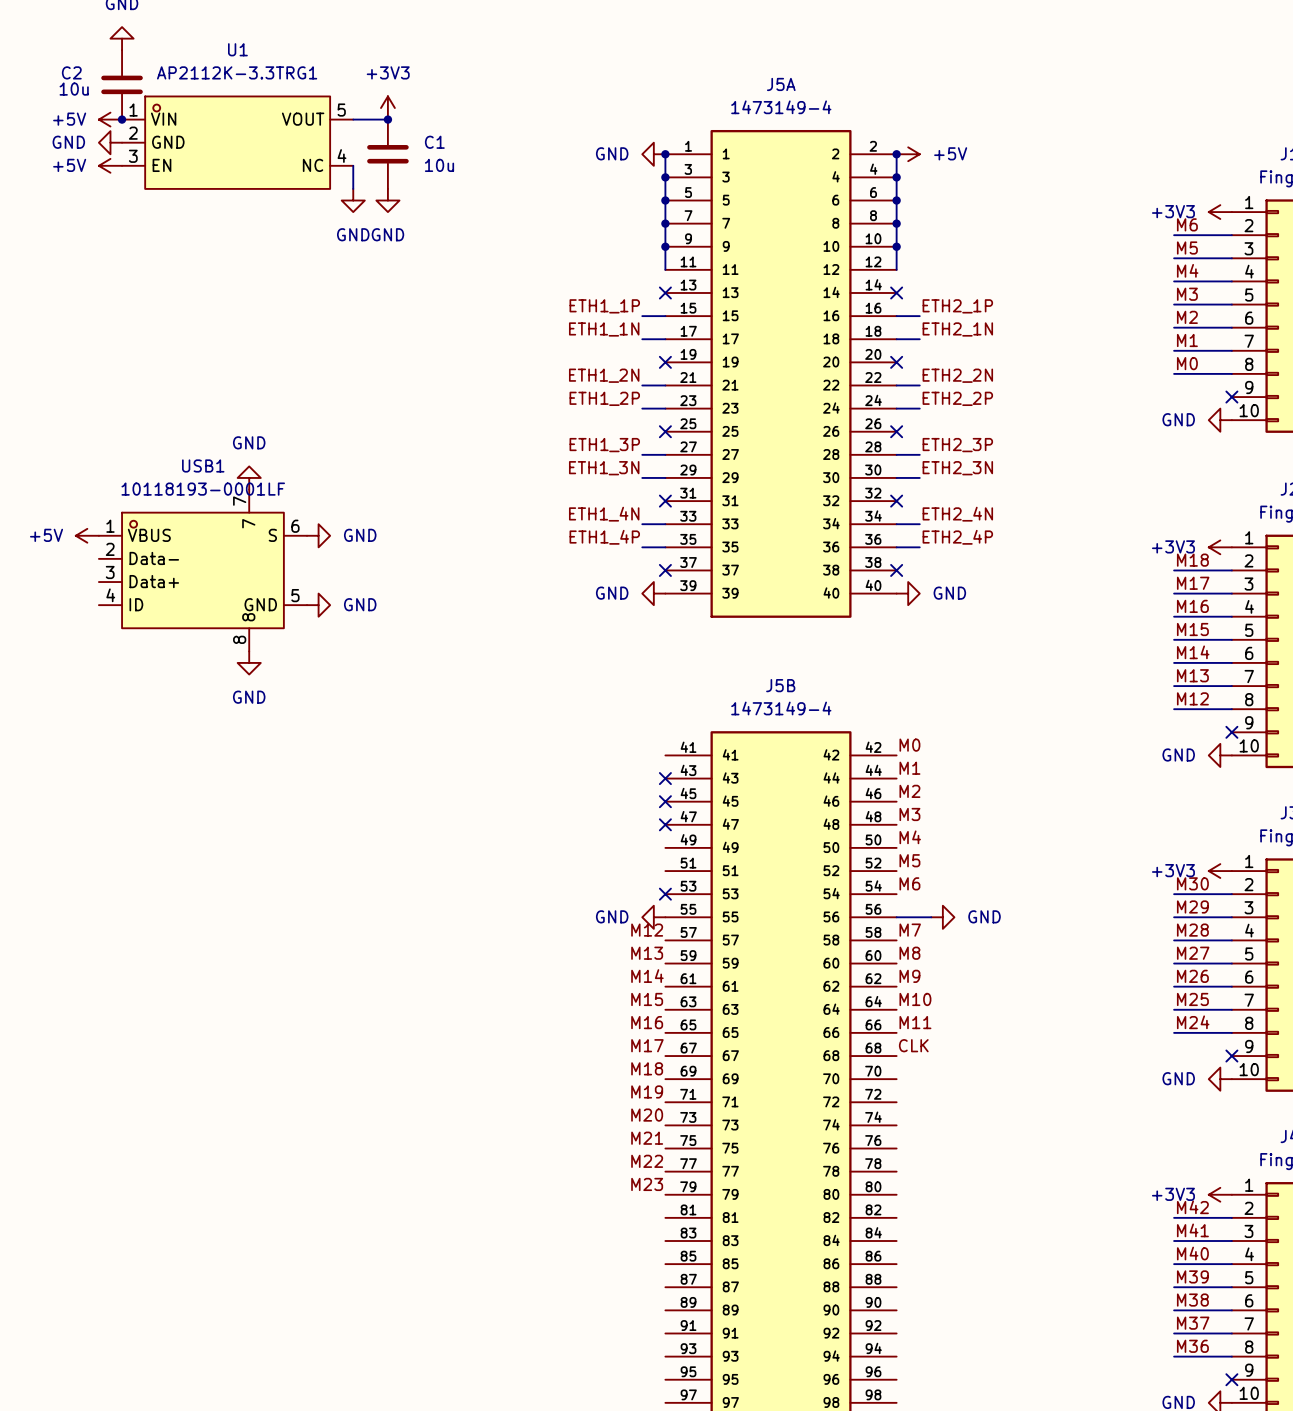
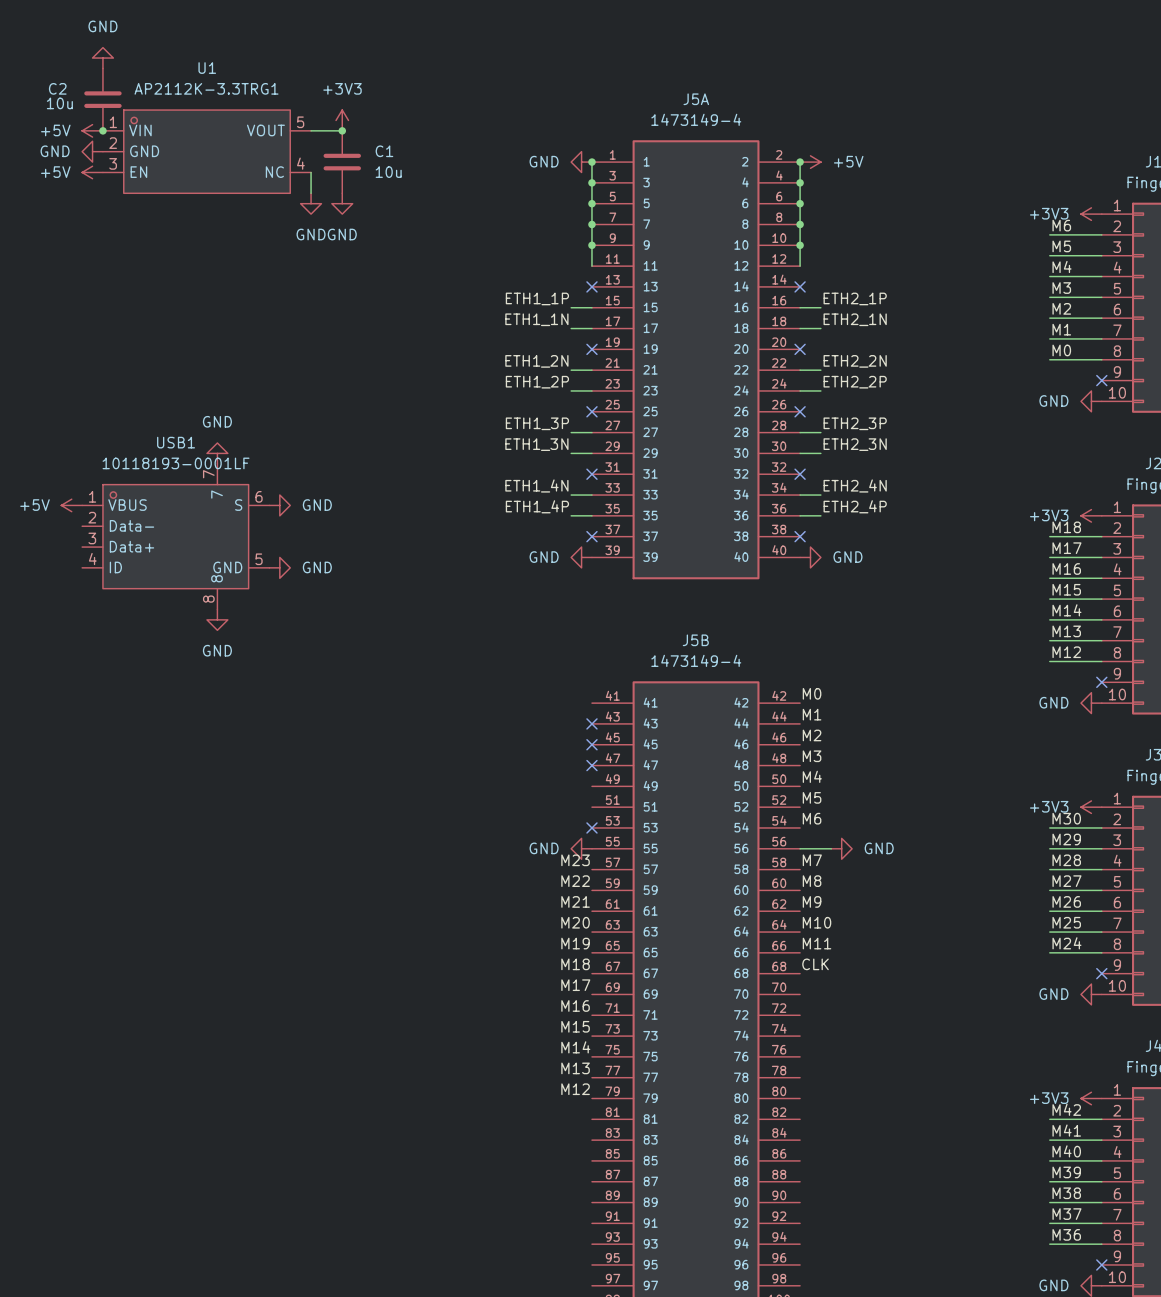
label: M12 (647, 930) -> M23 (575, 860)
label: M13 (647, 953) -> M22 (575, 881)
label: M14 (647, 976) -> M21 (575, 901)
label: M15 (647, 999) -> M20 (575, 922)
label: M16 (647, 1022) -> M19 (575, 943)
label: M17 (647, 1045) -> M18 (575, 964)
label: M18 (647, 1068) -> M17 (575, 985)
label: M19 (647, 1091) -> M16 (575, 1005)
label: M20 (647, 1115) -> M15 (575, 1026)
label: M21 (647, 1138) -> M14 (575, 1047)
label: M22 (647, 1161) -> M13 (575, 1068)
label: M23 (647, 1184) -> M12 (575, 1089)

